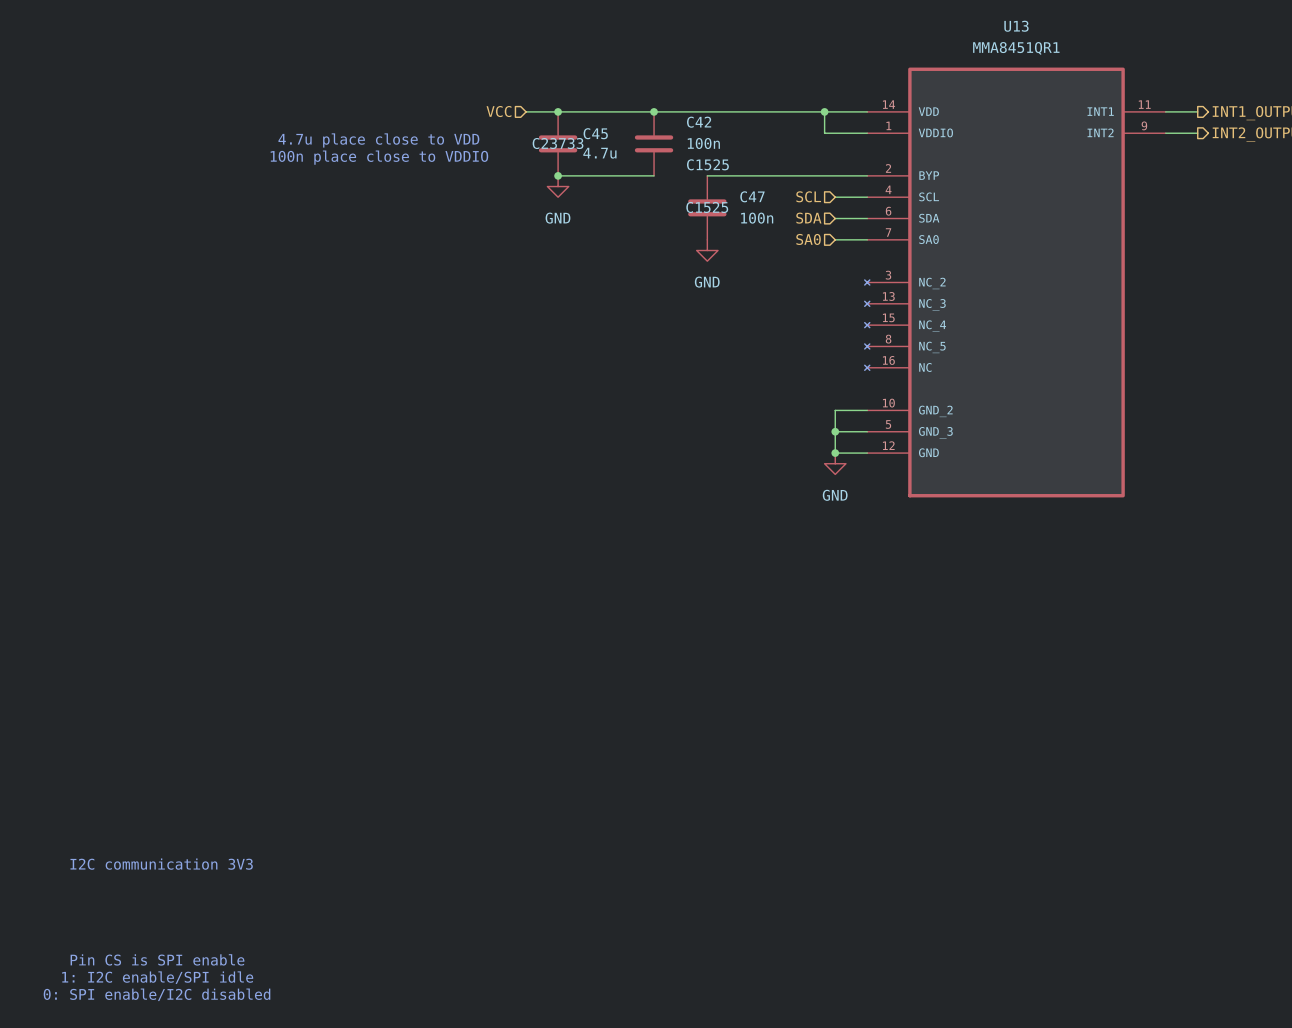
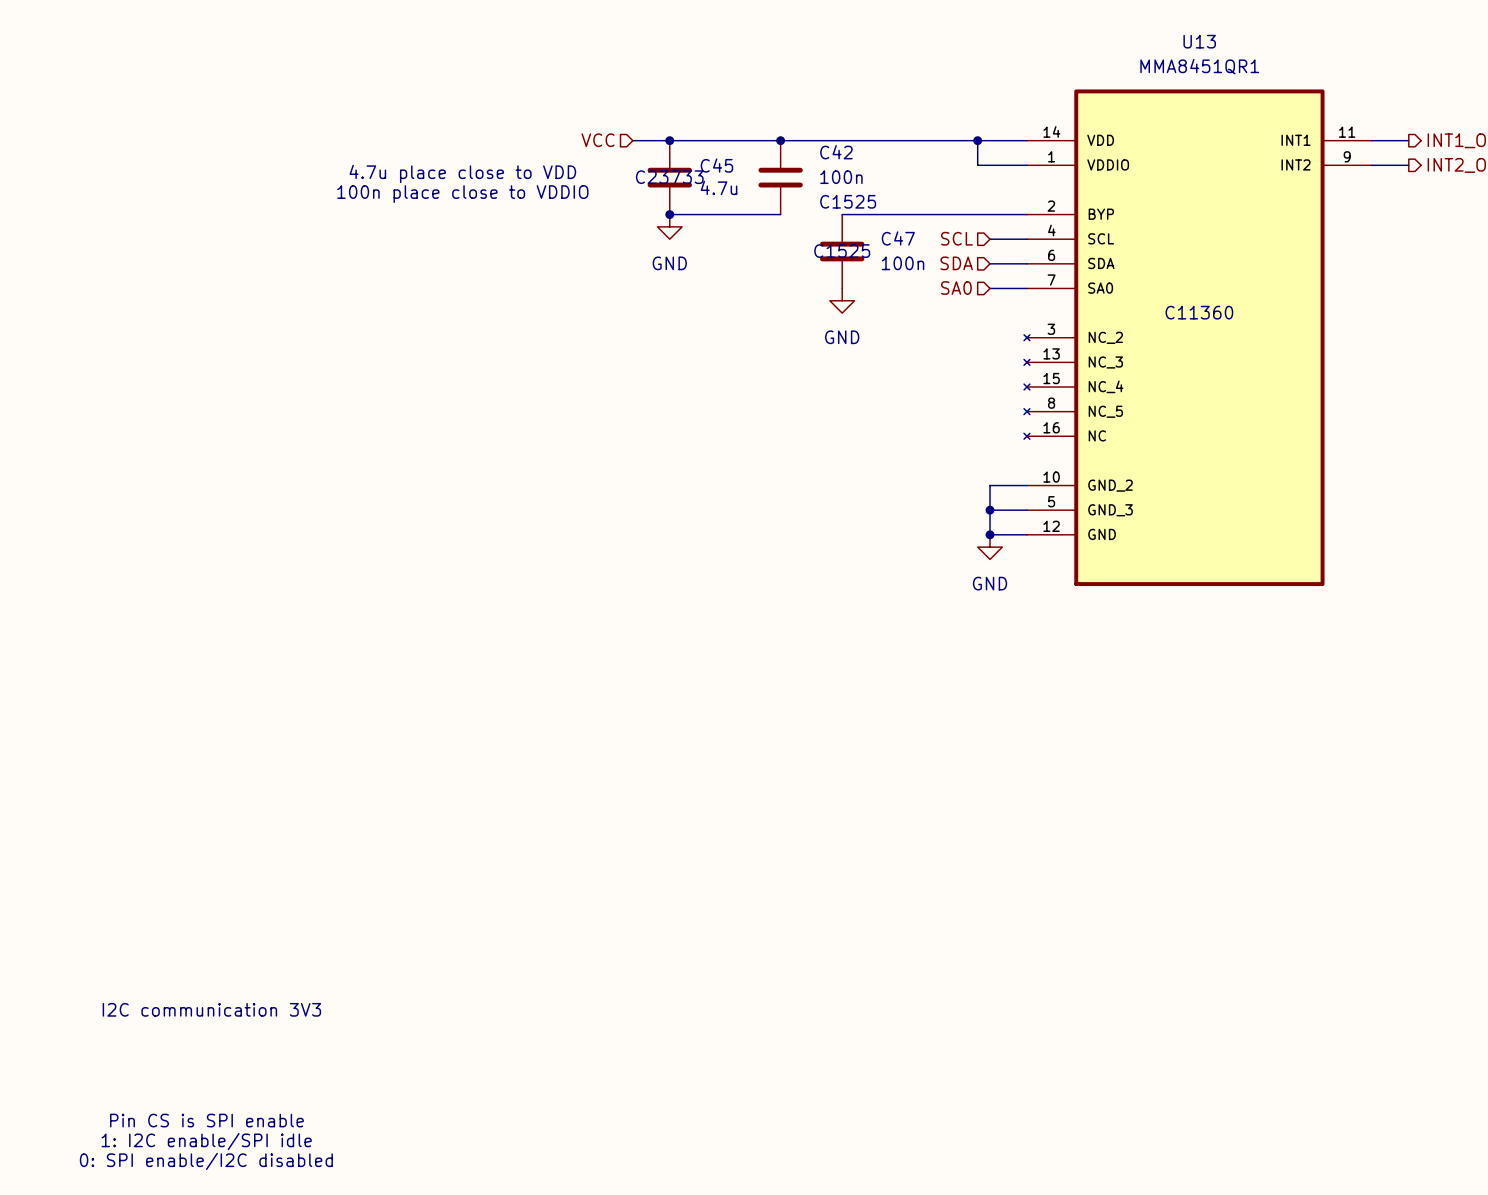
U13 text: none -> C11360 (1199, 312)

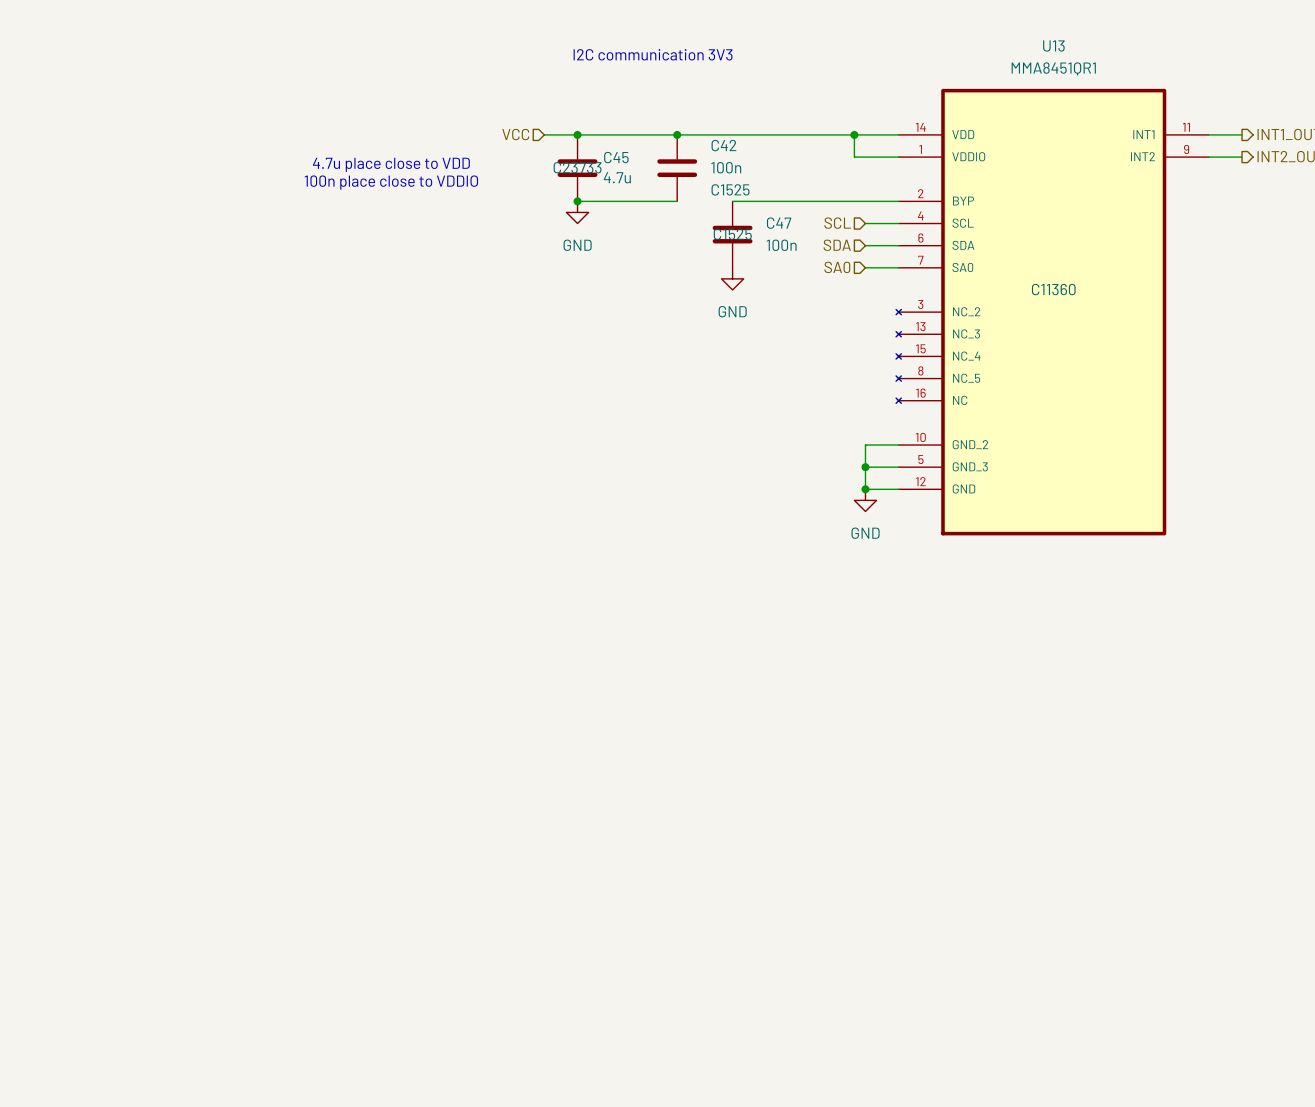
text: none -> I2C communication 3V3 (653, 54)
text: I2C communication 3V3 (211, 1009) -> none
text: Pin CS is SPI enable (206, 1120) -> none
text: 1: I2C enable/SPI idle (206, 1141) -> none
text: 0: SPI enable/I2C disabled (206, 1161) -> none

